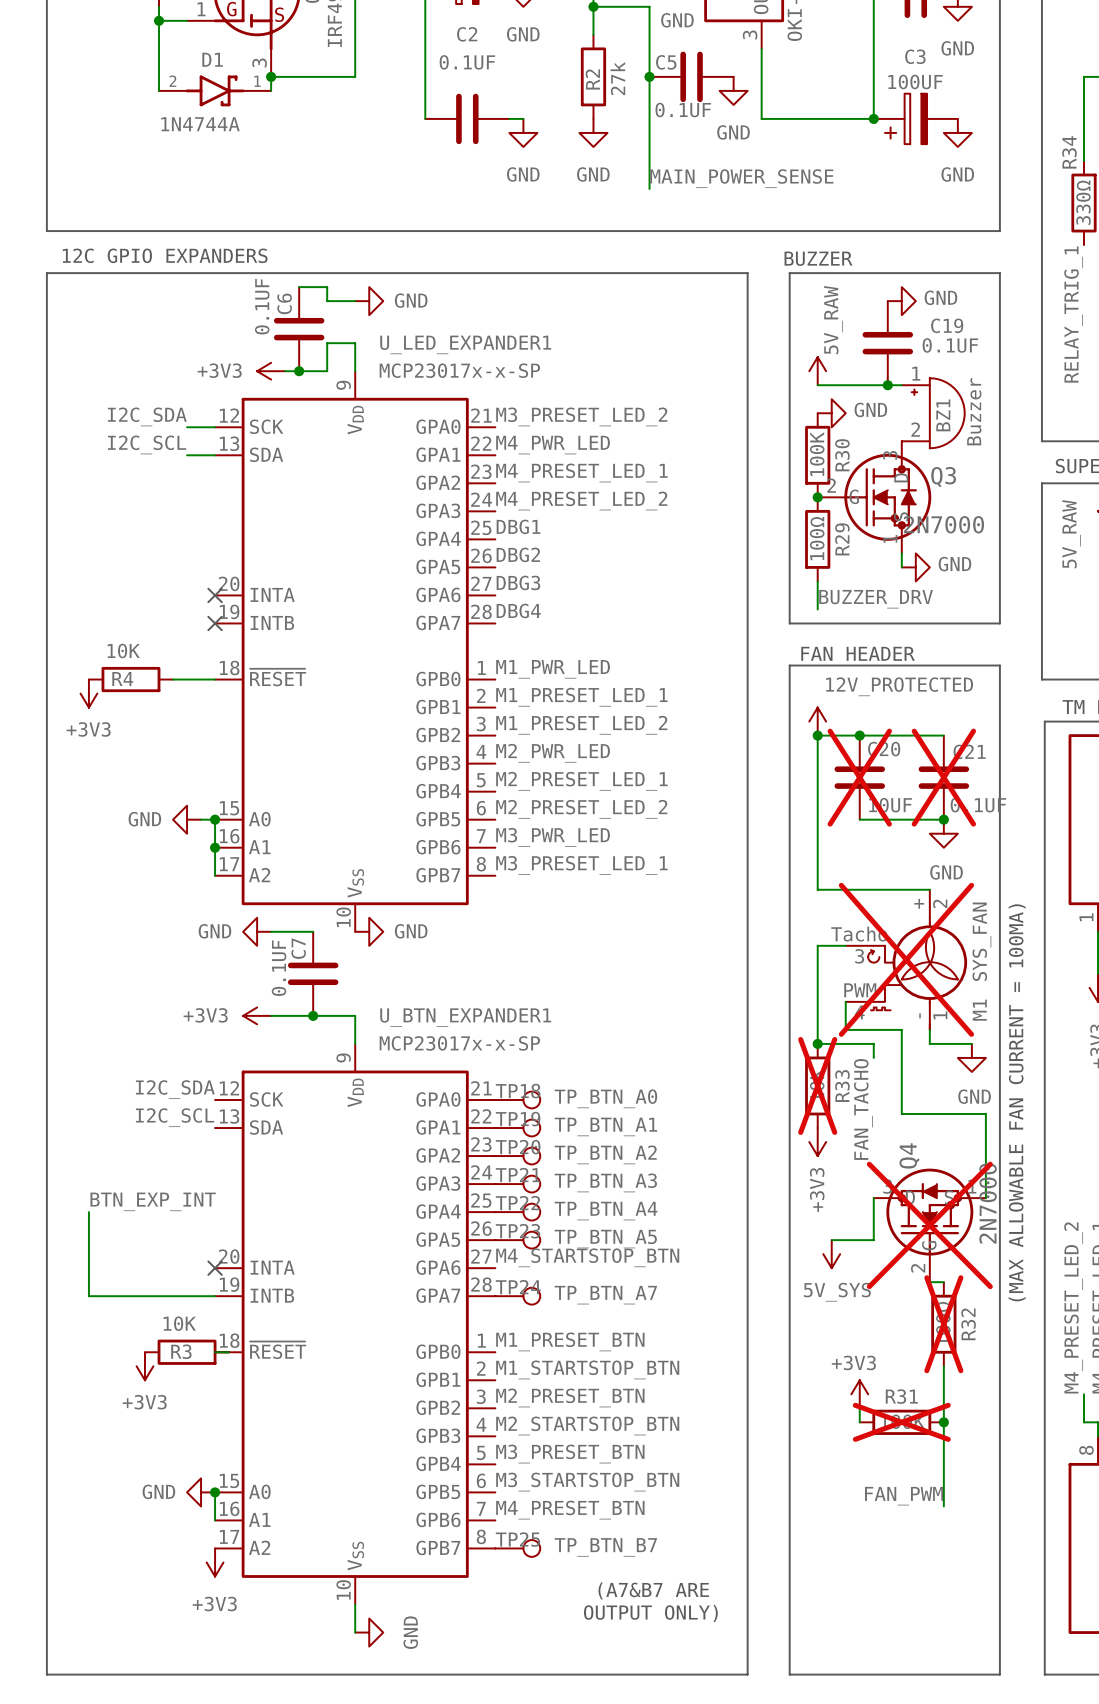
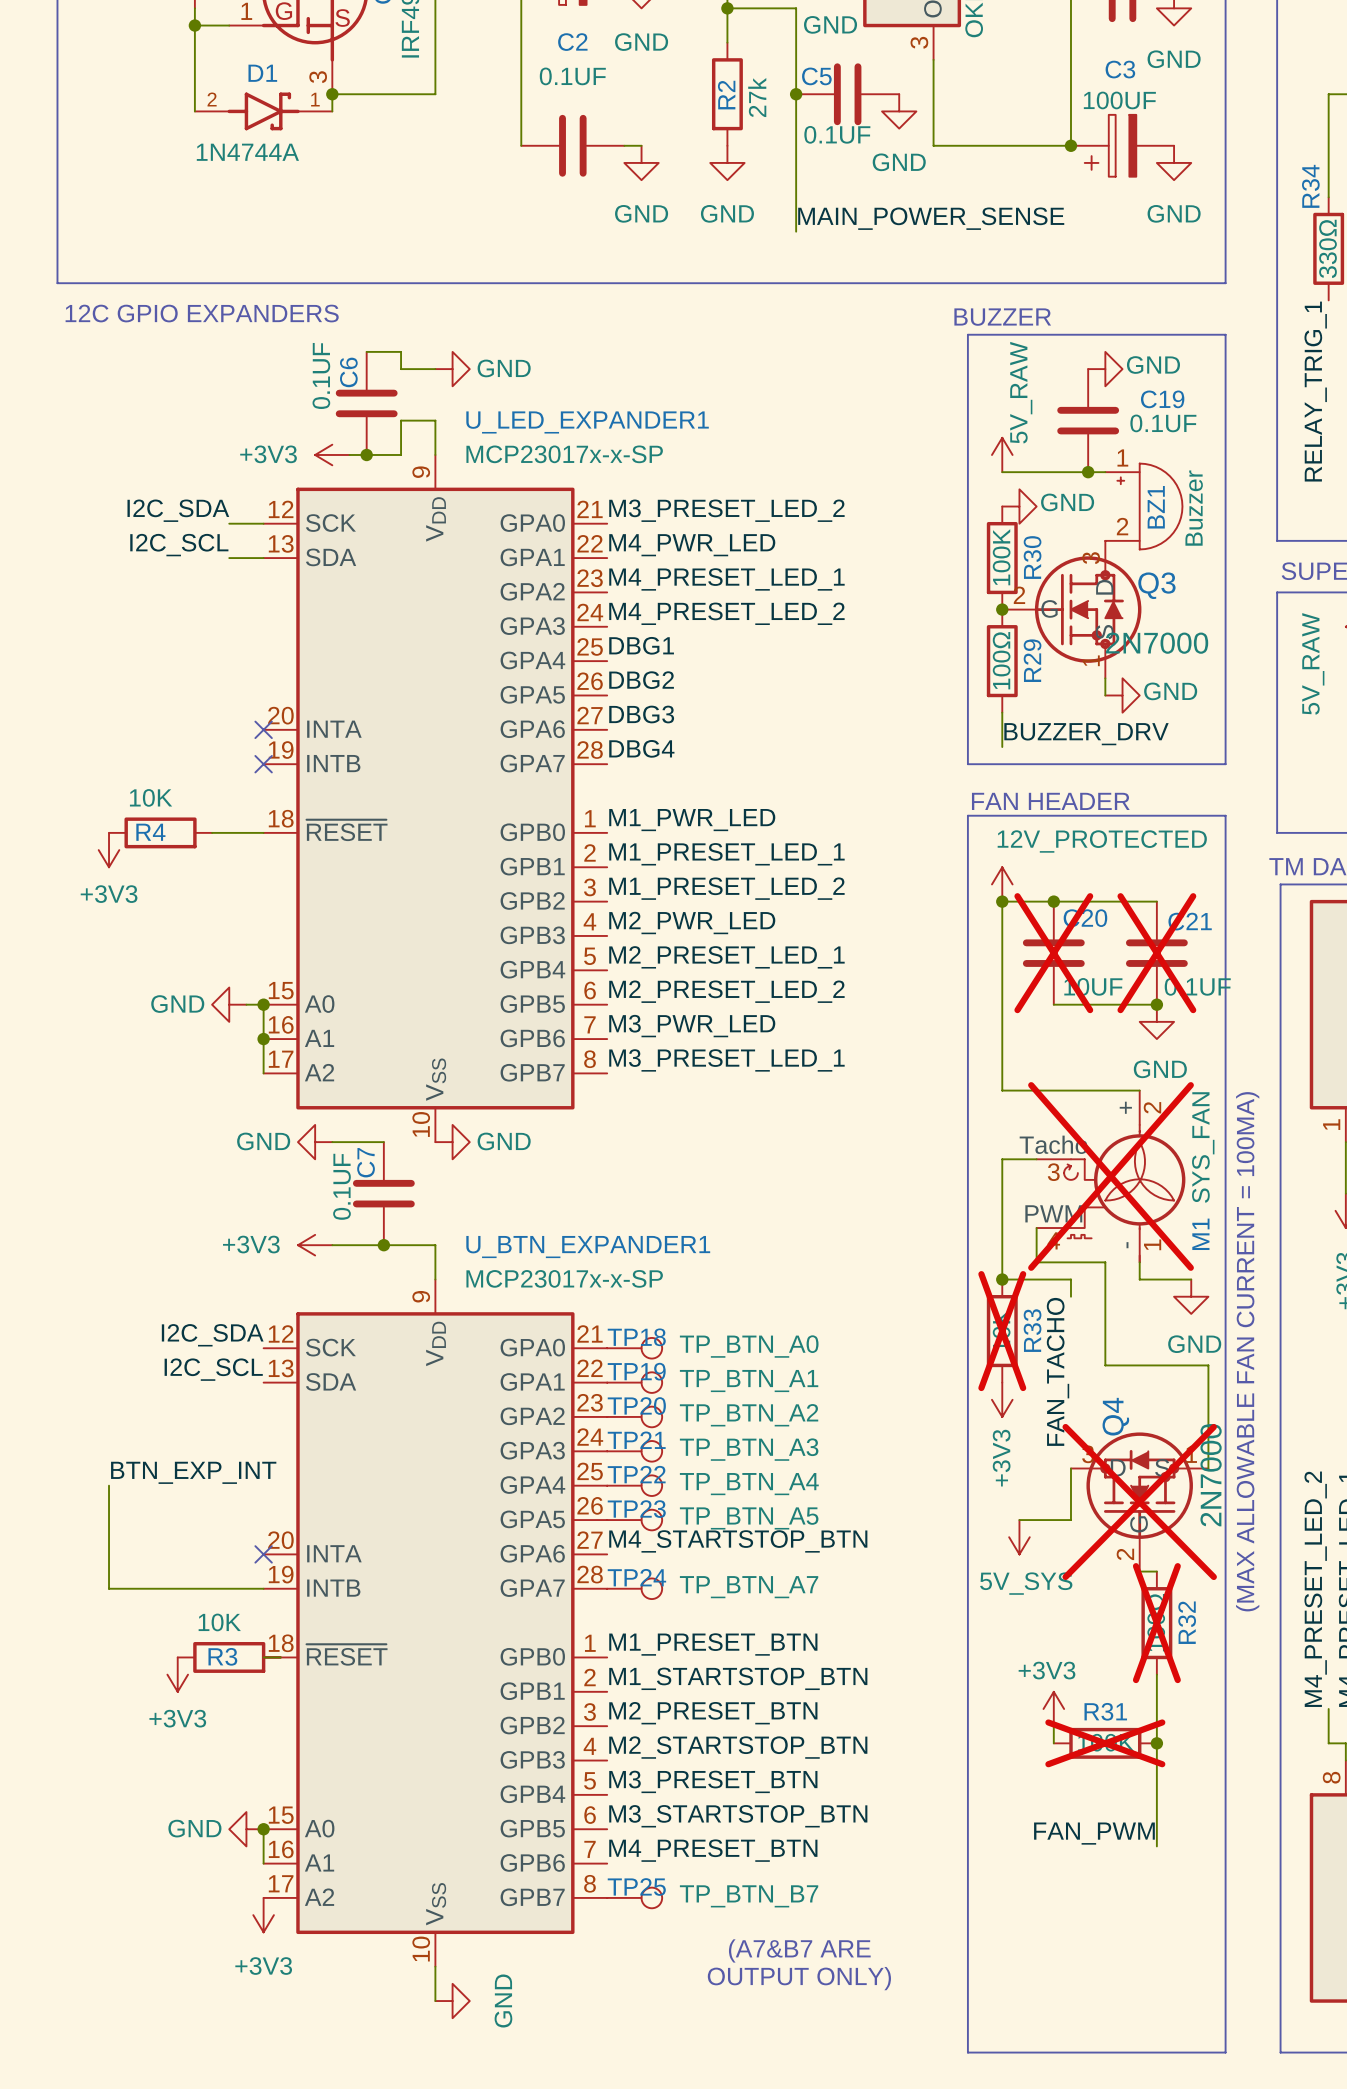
line: (46, 273) (747, 273) (747, 1674) (46, 1674) (46, 273) -> none

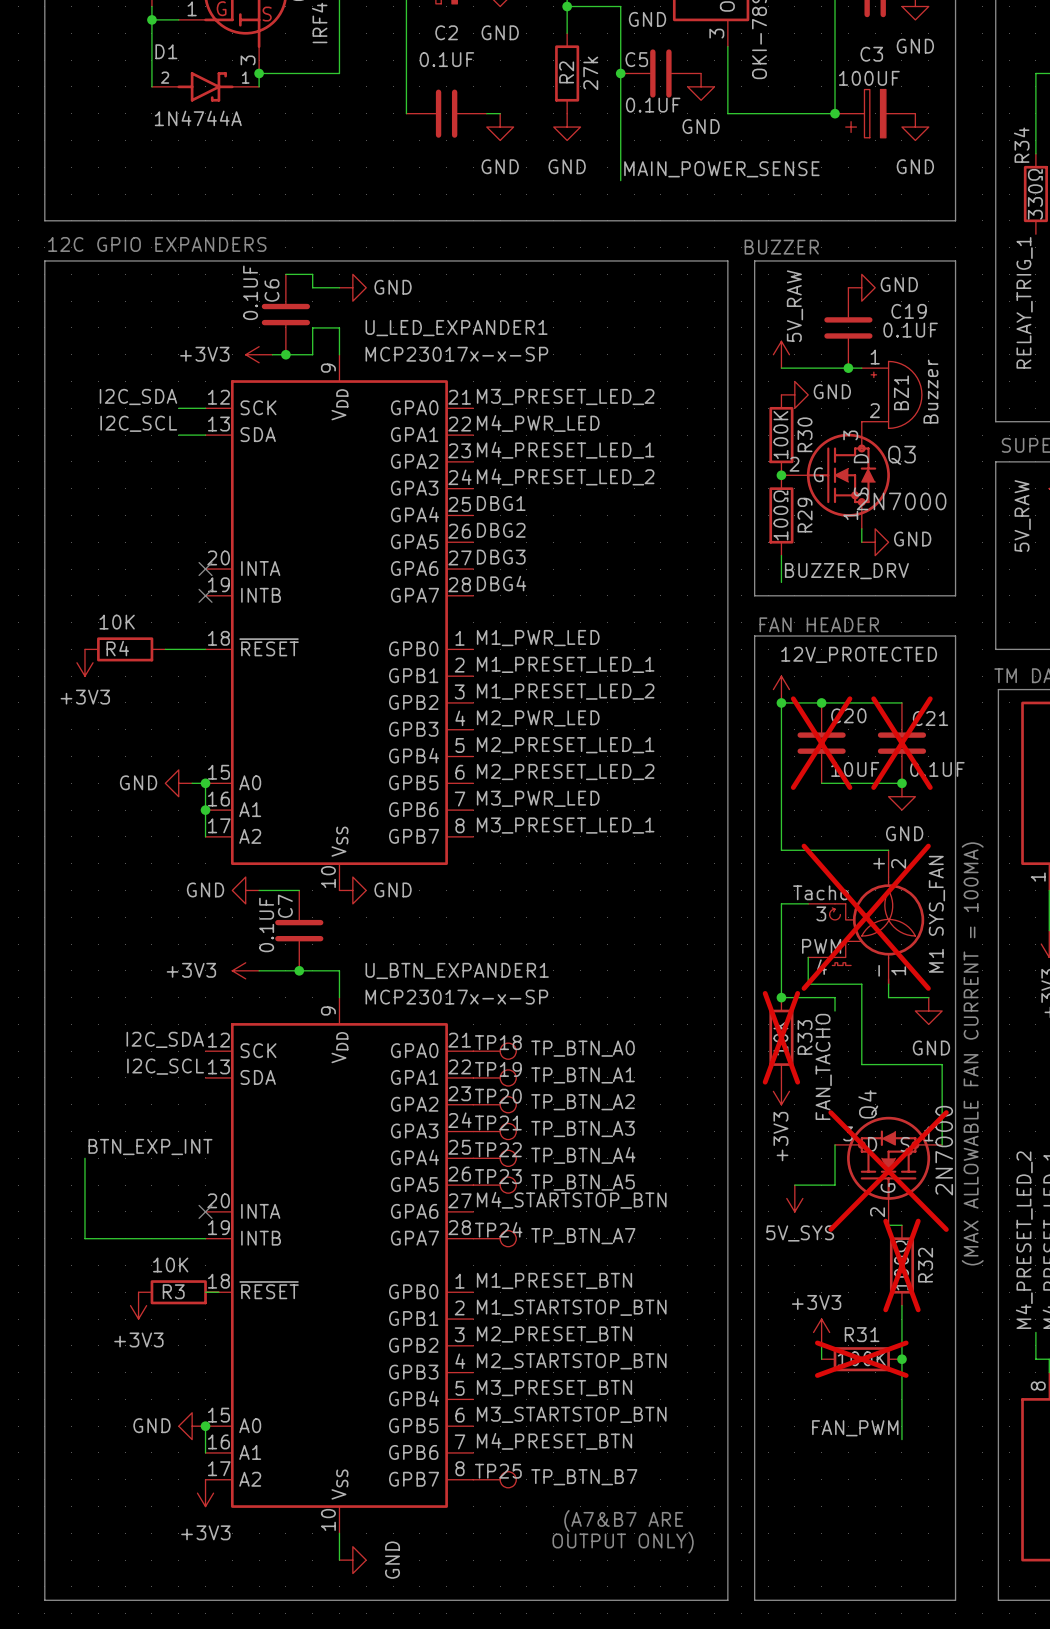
D1 name position: D1 (262, 73) -> D1 (166, 51)
line: none -> (44, 260) (727, 260) (727, 1600) (44, 1600) (44, 260)

